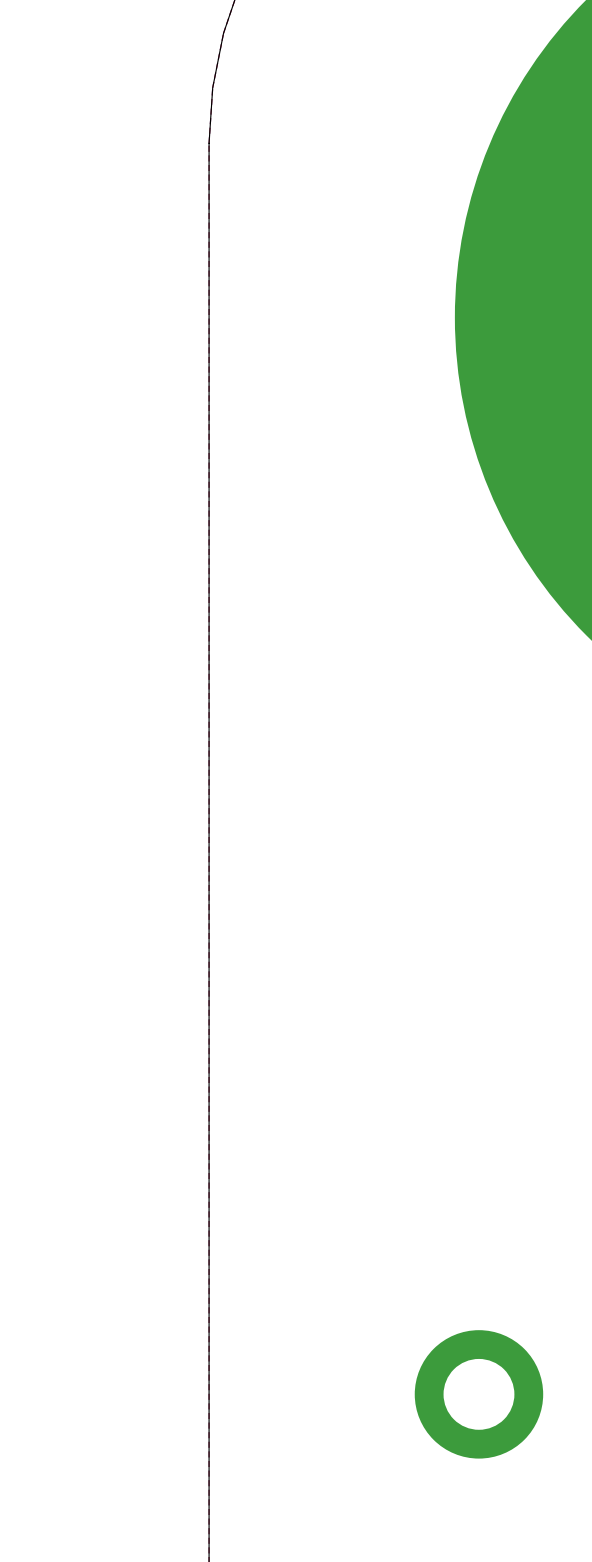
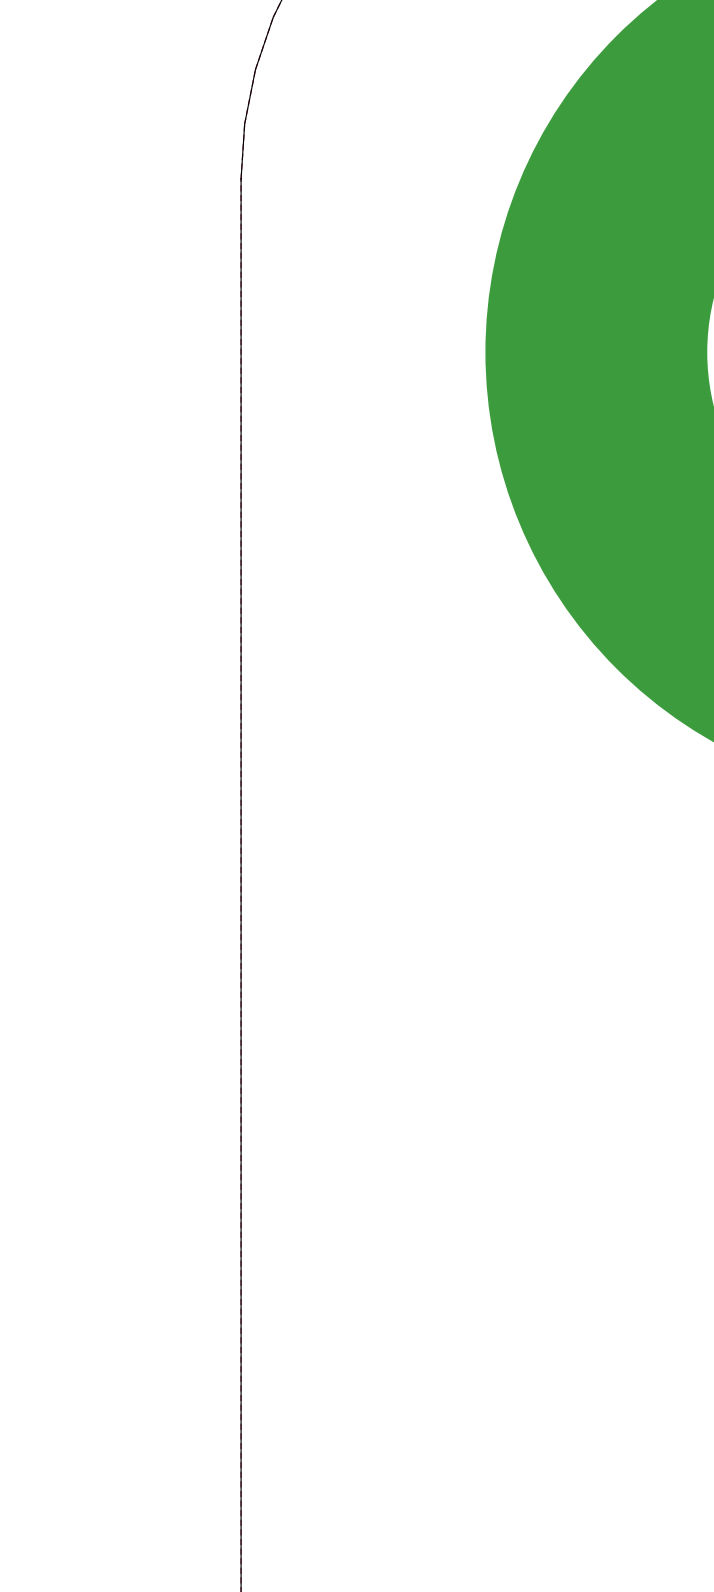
via: (478, 1394) -> none

